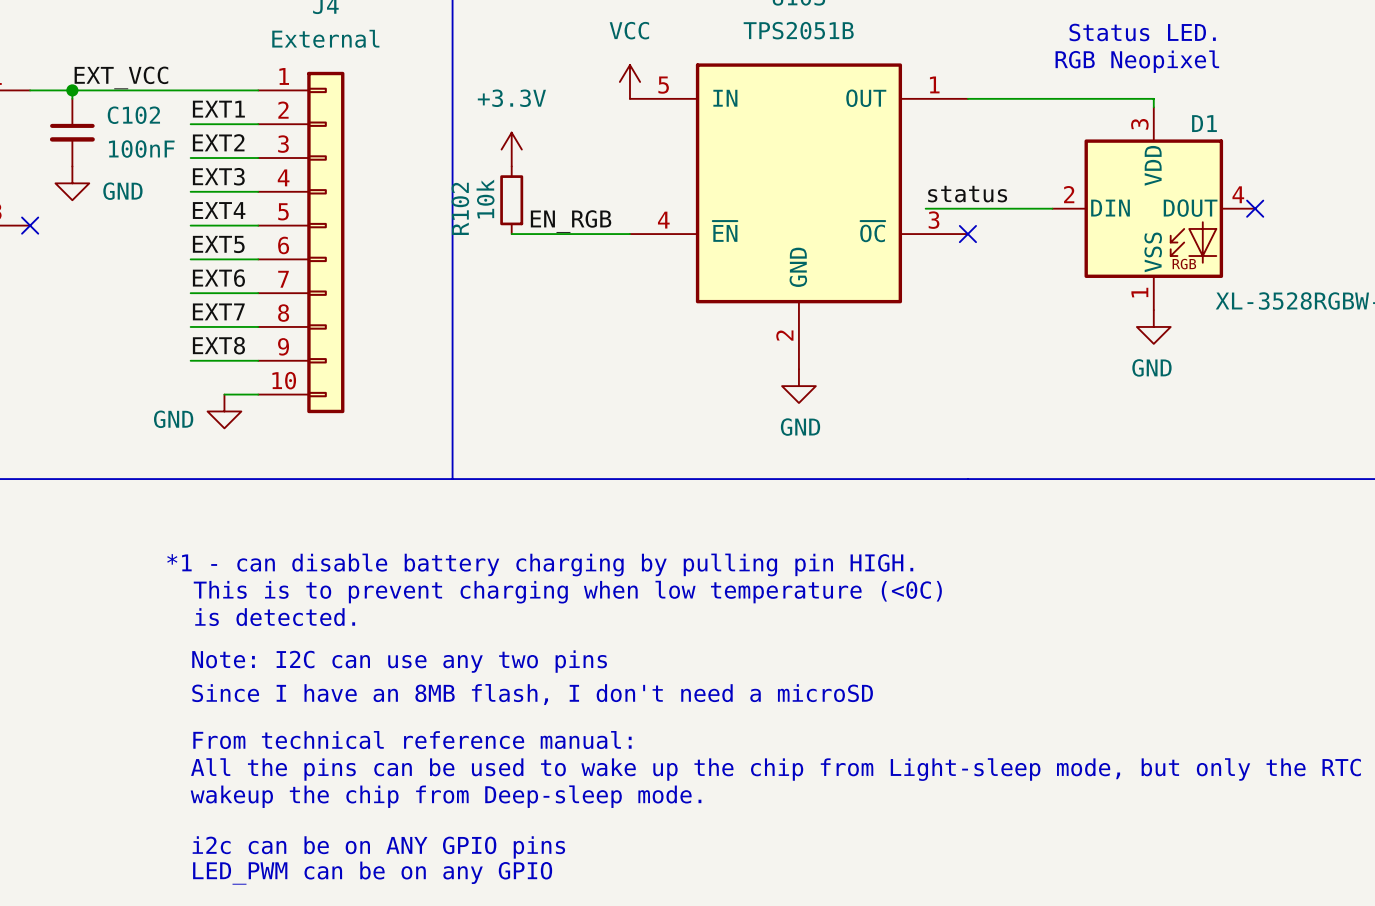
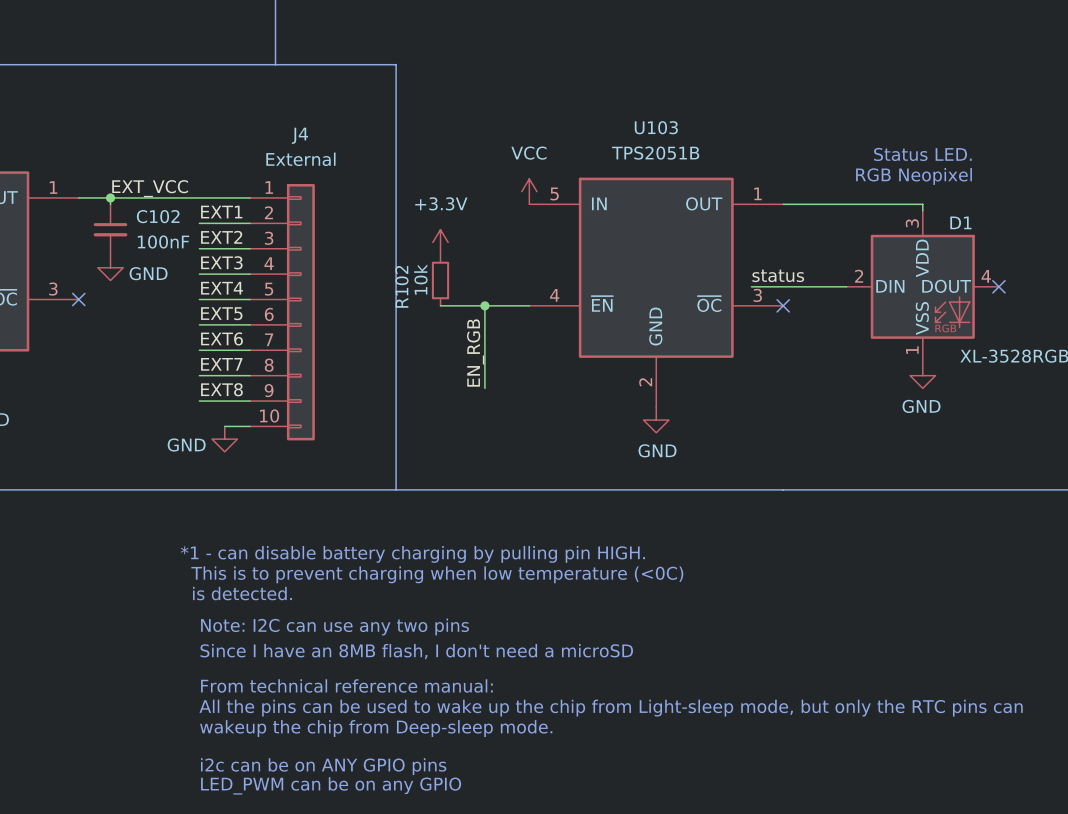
label rotation: 0° (571, 221) -> 90° counterclockwise (475, 352)
wire: none -> (484, 305) (484, 388)
junction: none -> (484, 305)

